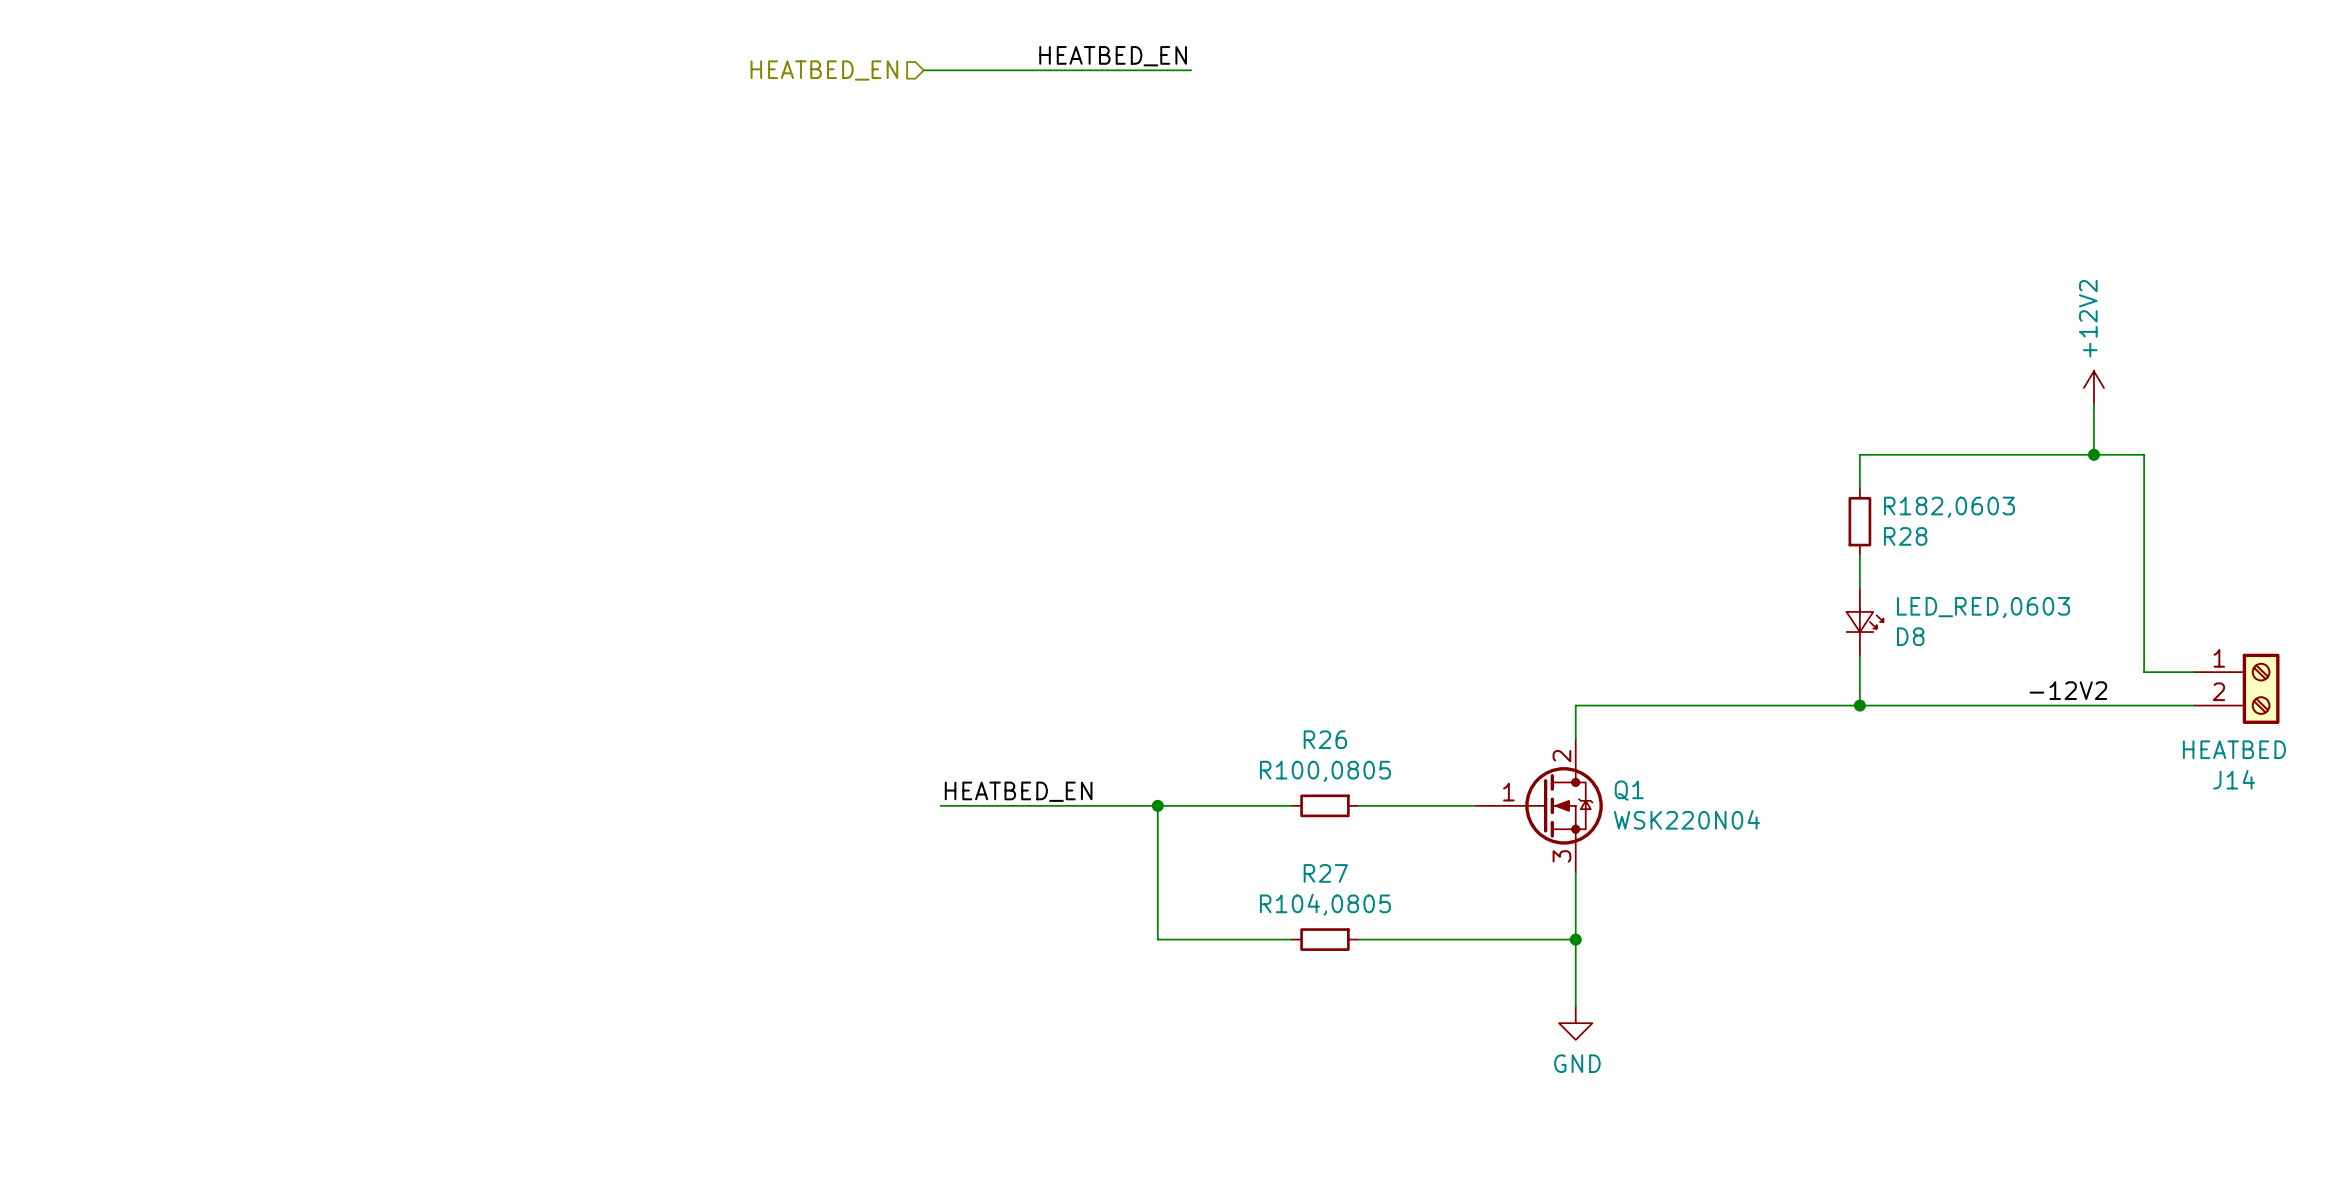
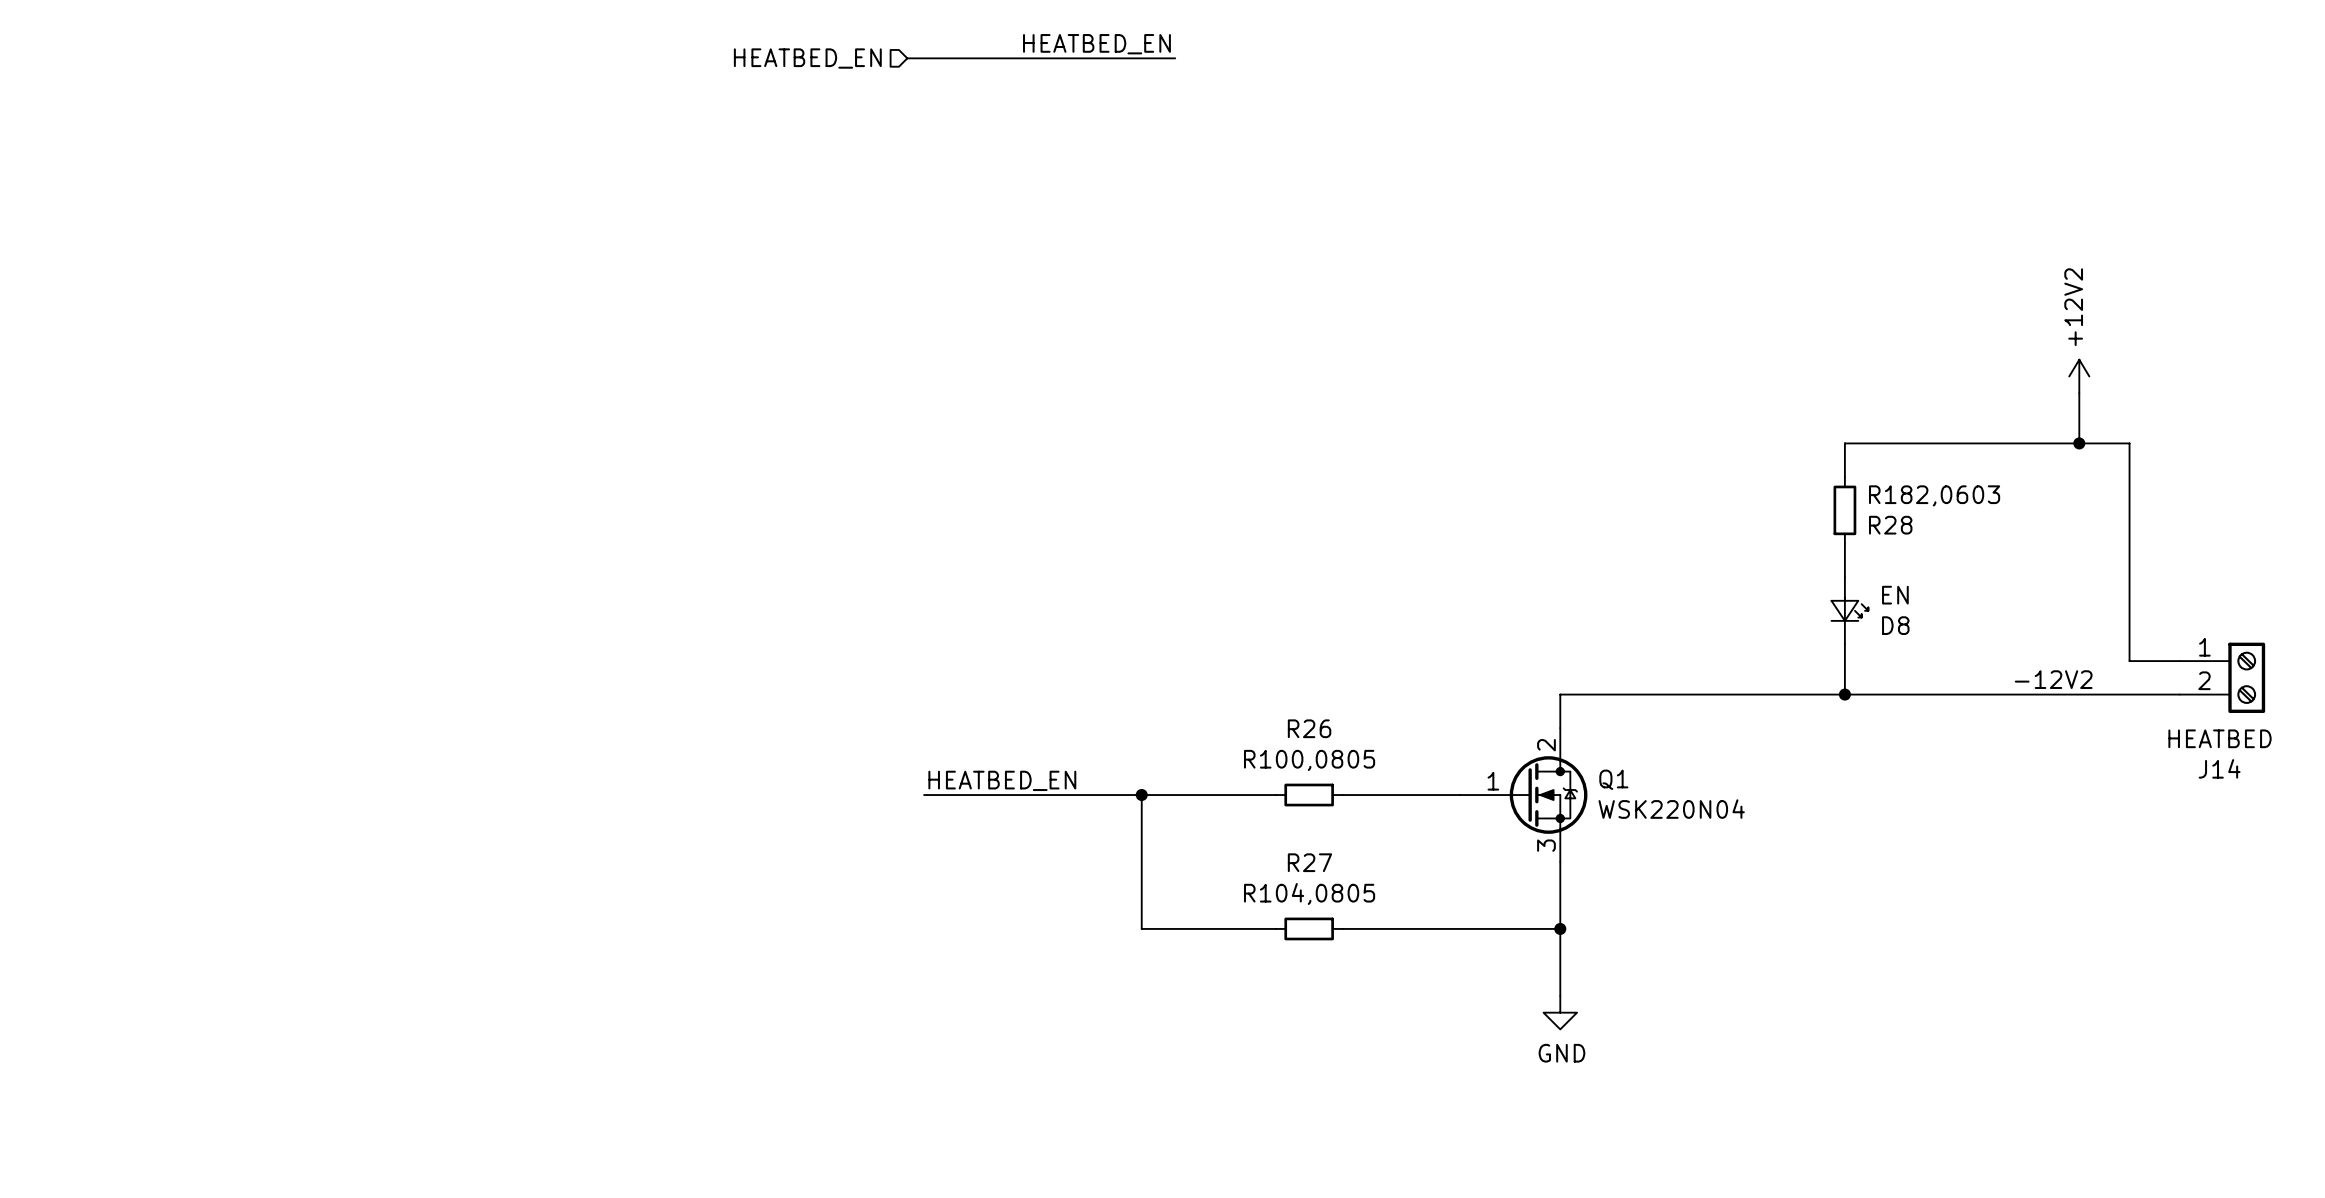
D8 value: LED_RED,0603 (1983, 607) -> EN (1895, 595)

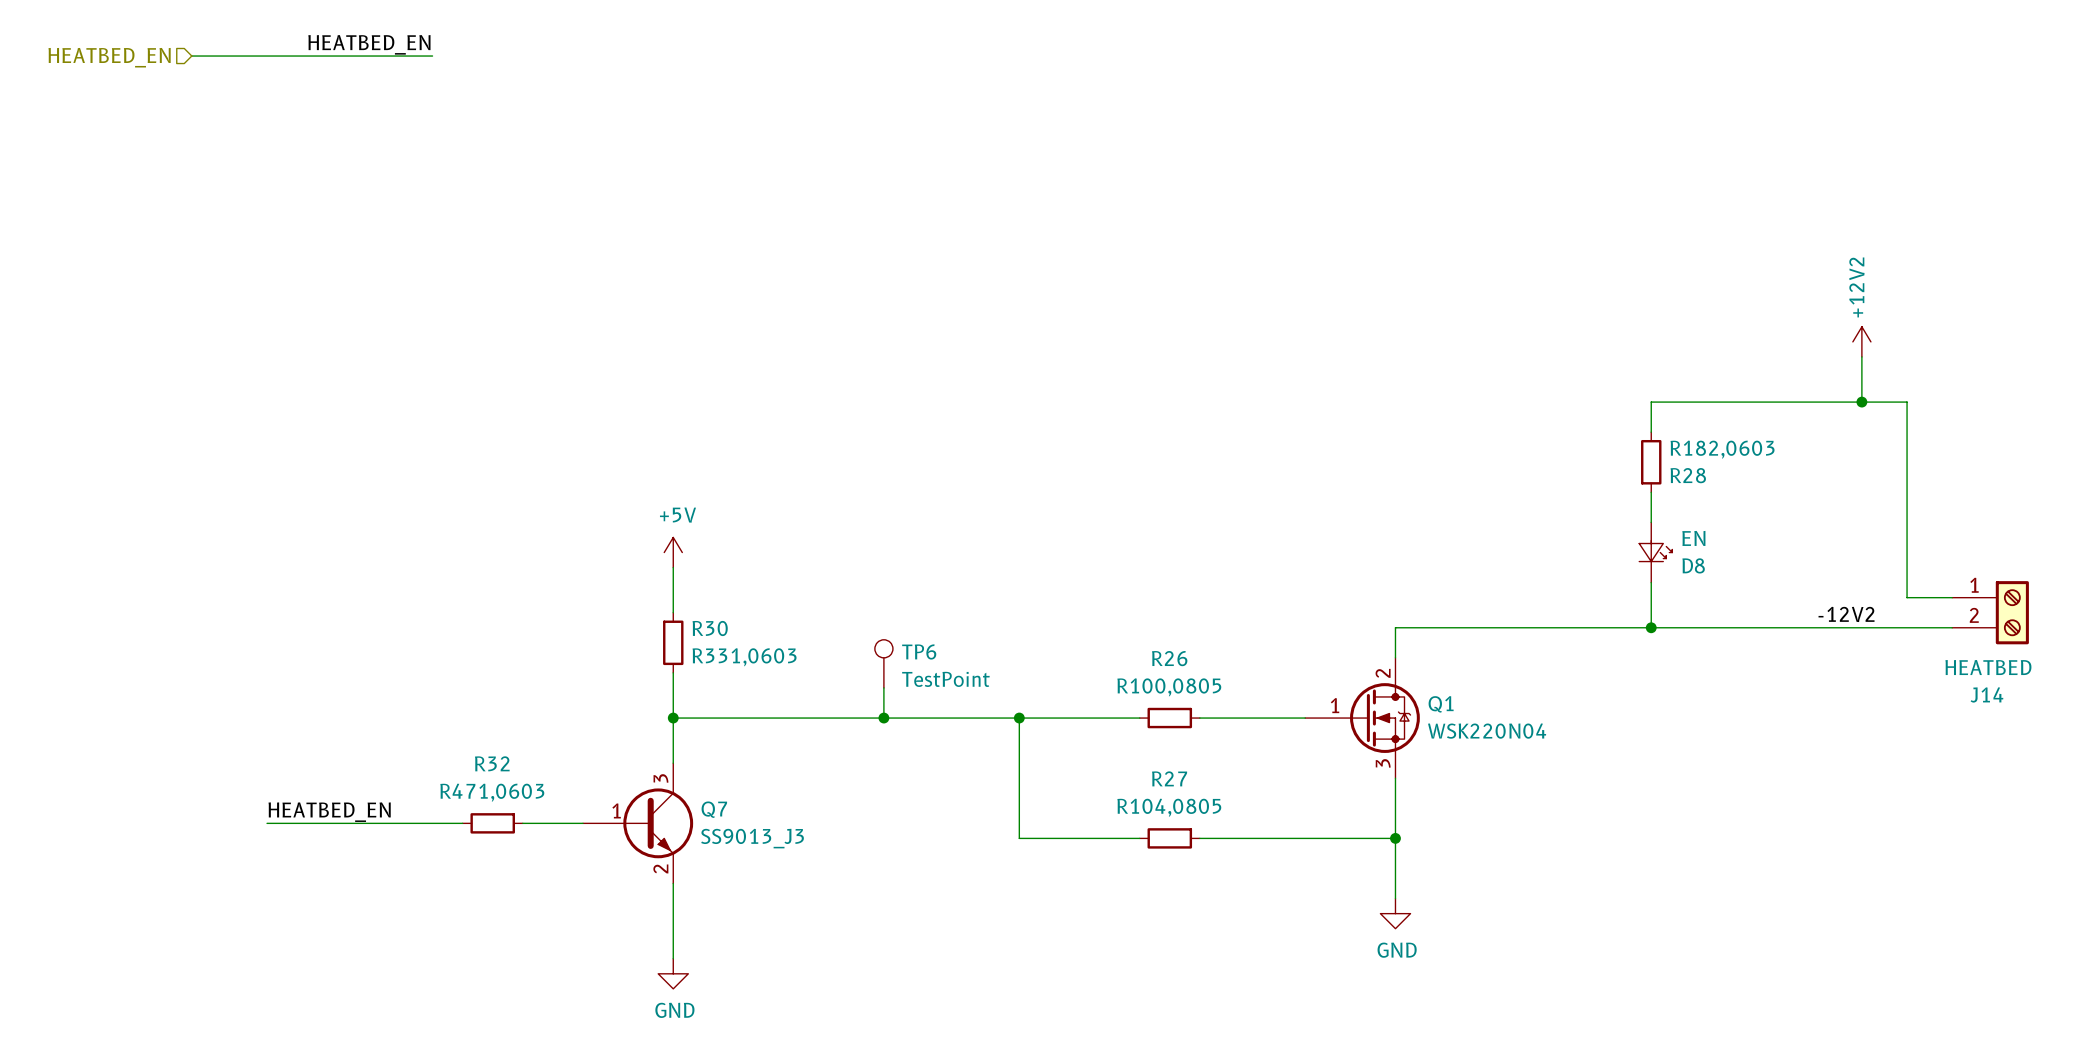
label: none -> HEATBED_EN (369, 44)
label: HEATBED_EN (1096, 44) -> none
hierarchical label: none -> HEATBED_EN (109, 57)
wire: none -> (191, 56) (432, 56)
hierarchical label: HEATBED_EN (807, 58) -> none
wire: (907, 58) (1175, 58) -> none
power symbol: none -> +5V (673, 552)
wire: none -> (673, 567) (673, 612)
R30: none -> R331,0603 (673, 642)
TP6: none -> TestPoint (883, 663)
wire: none -> (673, 672) (673, 763)
wire: none -> (883, 687) (883, 718)
label: HEATBED_EN (1002, 780) -> none
wire: none -> (673, 718) (823, 718)
junction: none -> (673, 718)
junction: none -> (883, 718)
label: none -> HEATBED_EN (329, 812)
wire: none -> (267, 823) (462, 823)
R32: none -> R471,0603 (492, 823)
wire: none -> (522, 823) (582, 823)
Q7: none -> SS9013_J3 (638, 823)
wire: none -> (673, 883) (673, 958)
power symbol: none -> GND (673, 973)

